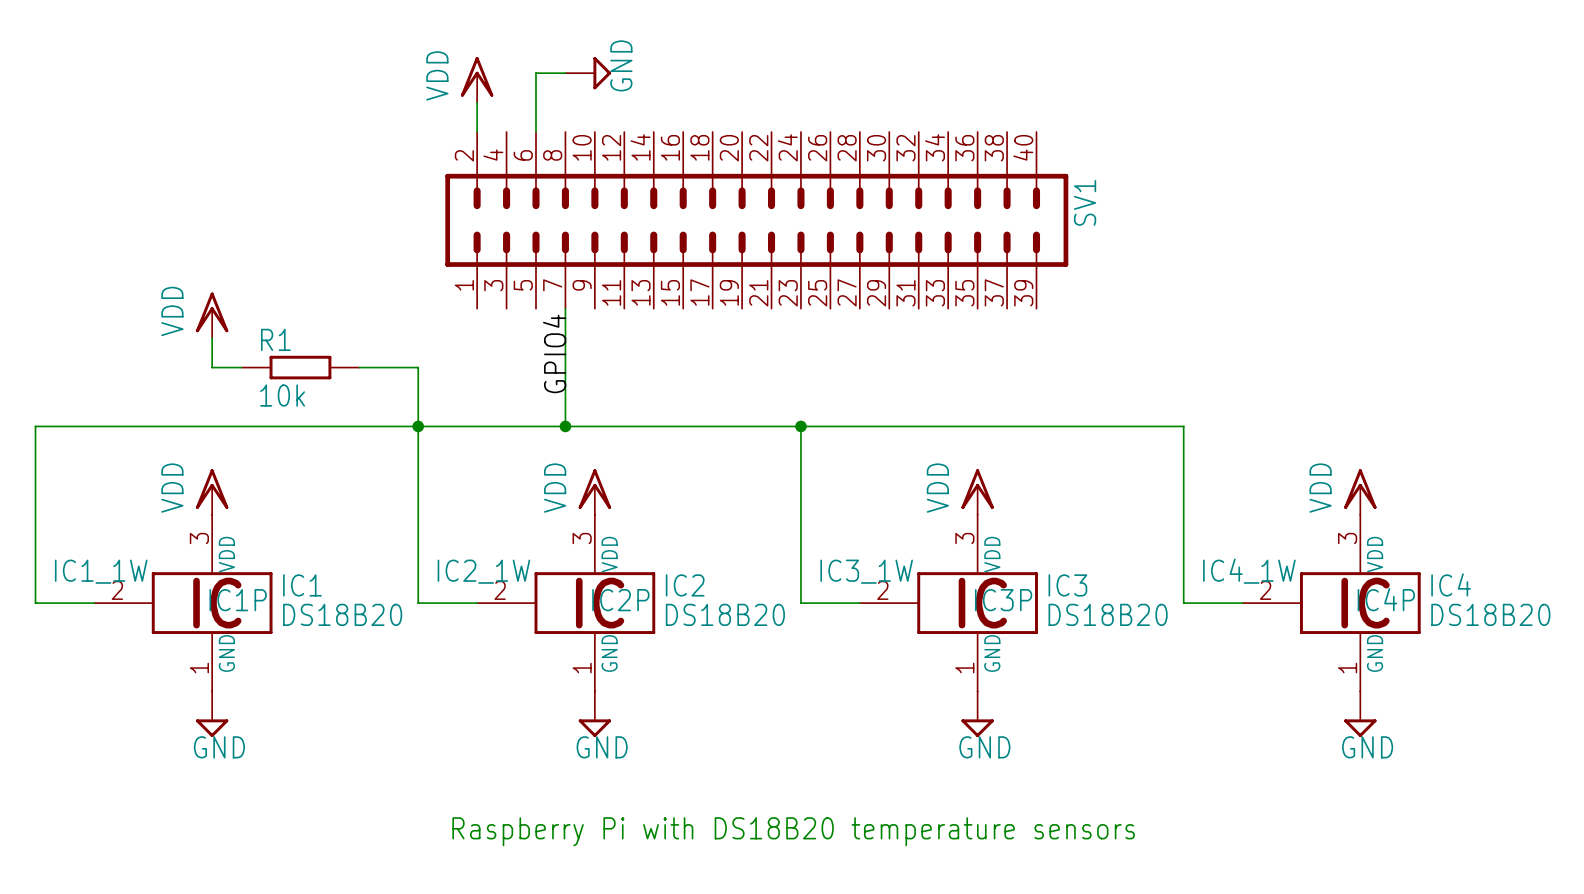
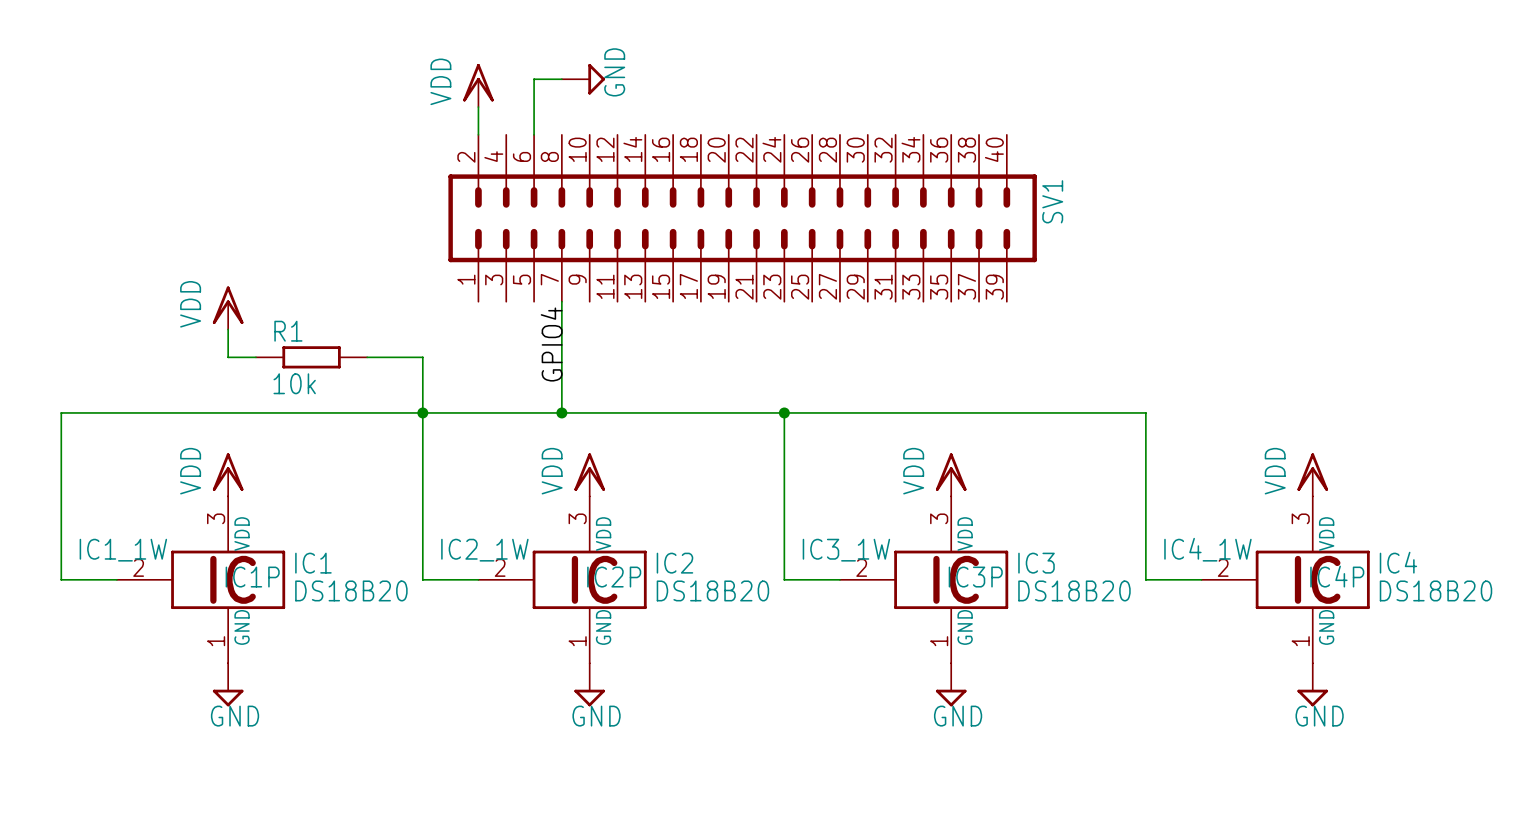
text: Raspberry Pi with DS18B20 temperature sensors (793, 831) -> none

